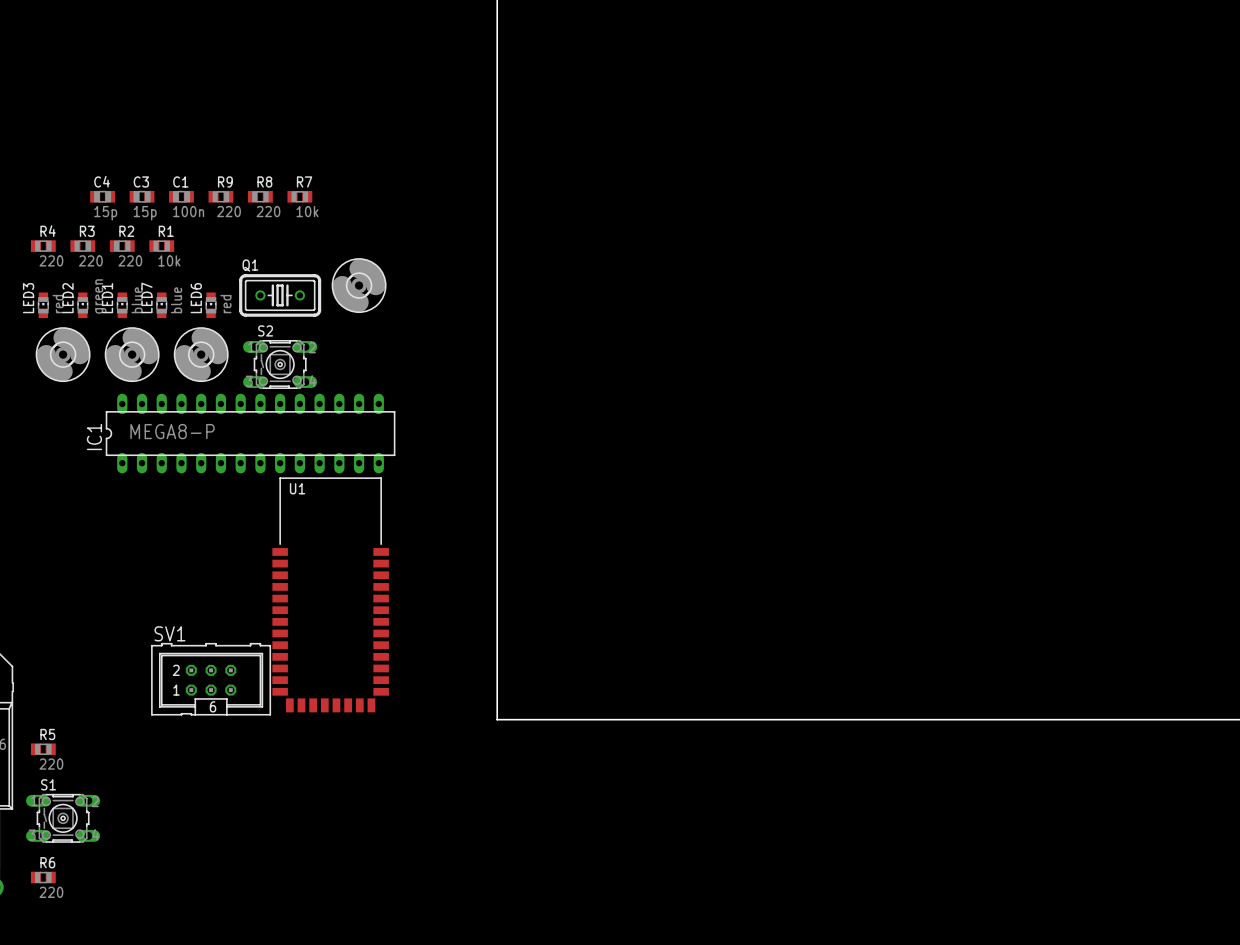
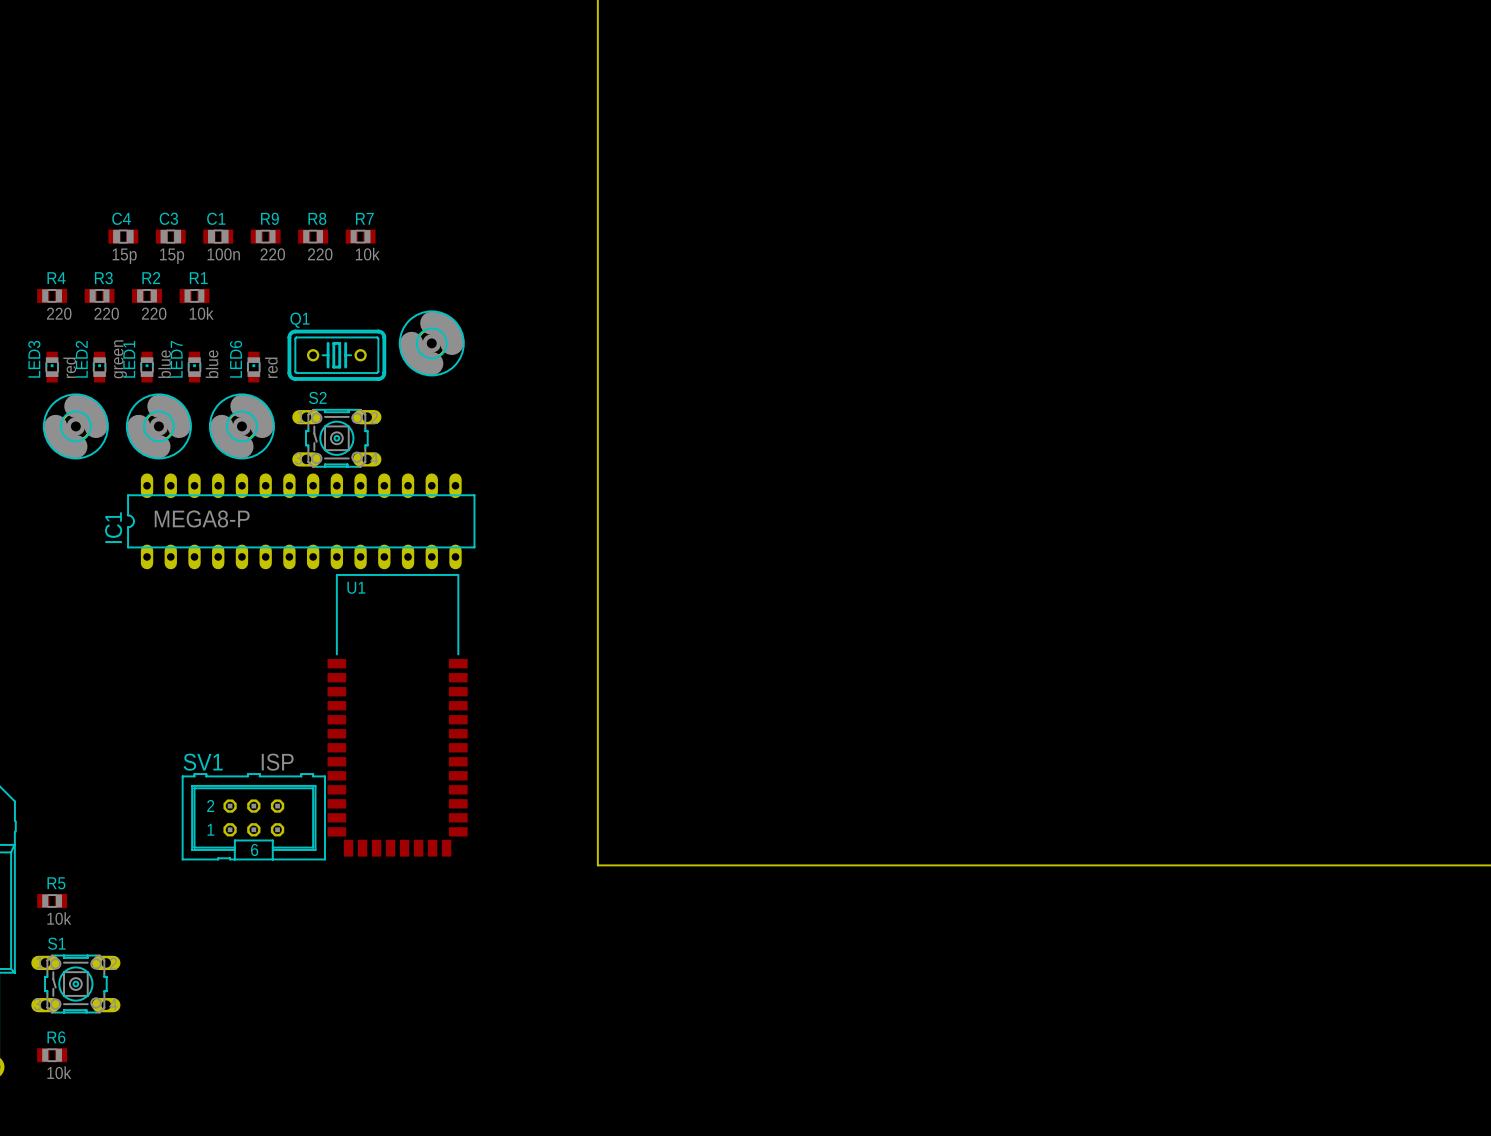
SV1 value: none -> ISP (277, 762)
R5 value: 220 (51, 764) -> 10k (59, 918)
R6 value: 220 (51, 892) -> 10k (59, 1072)

